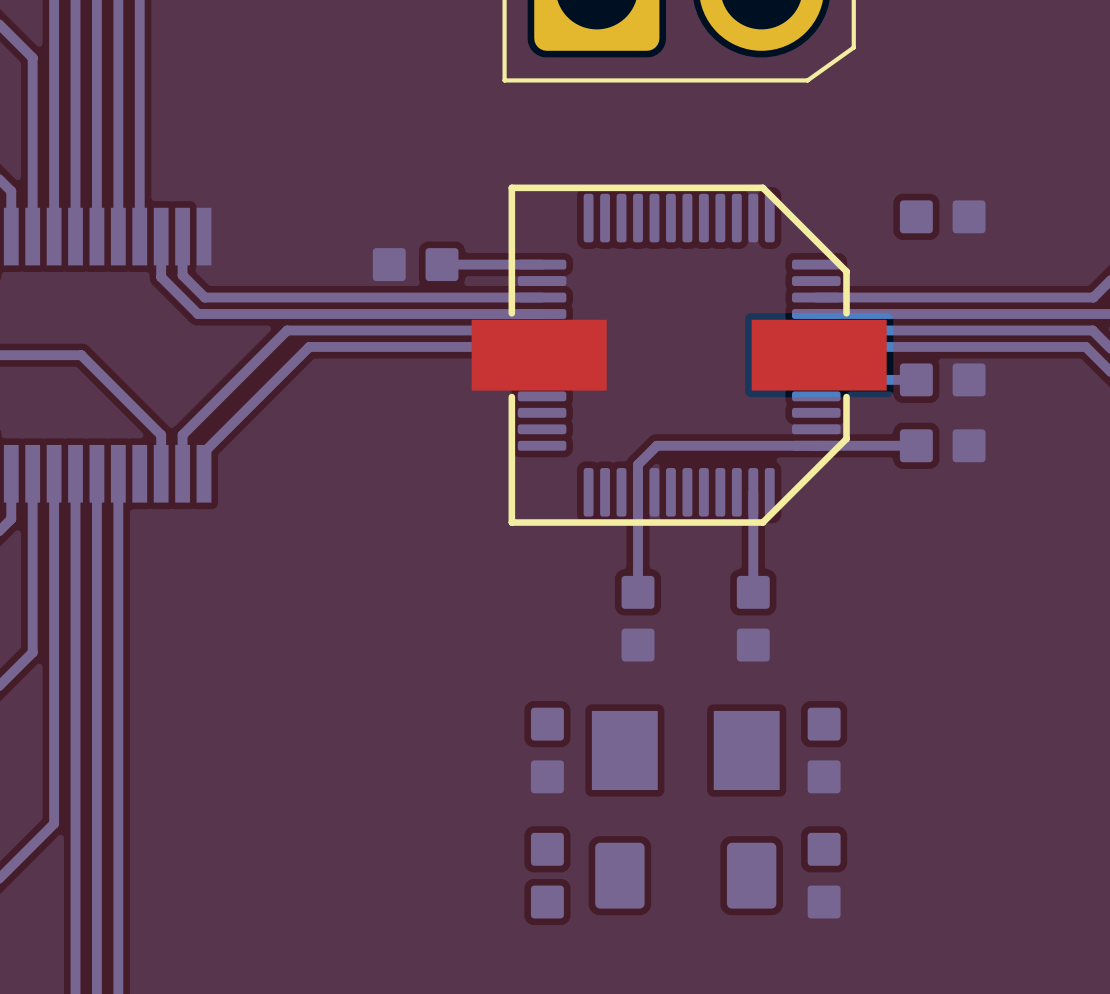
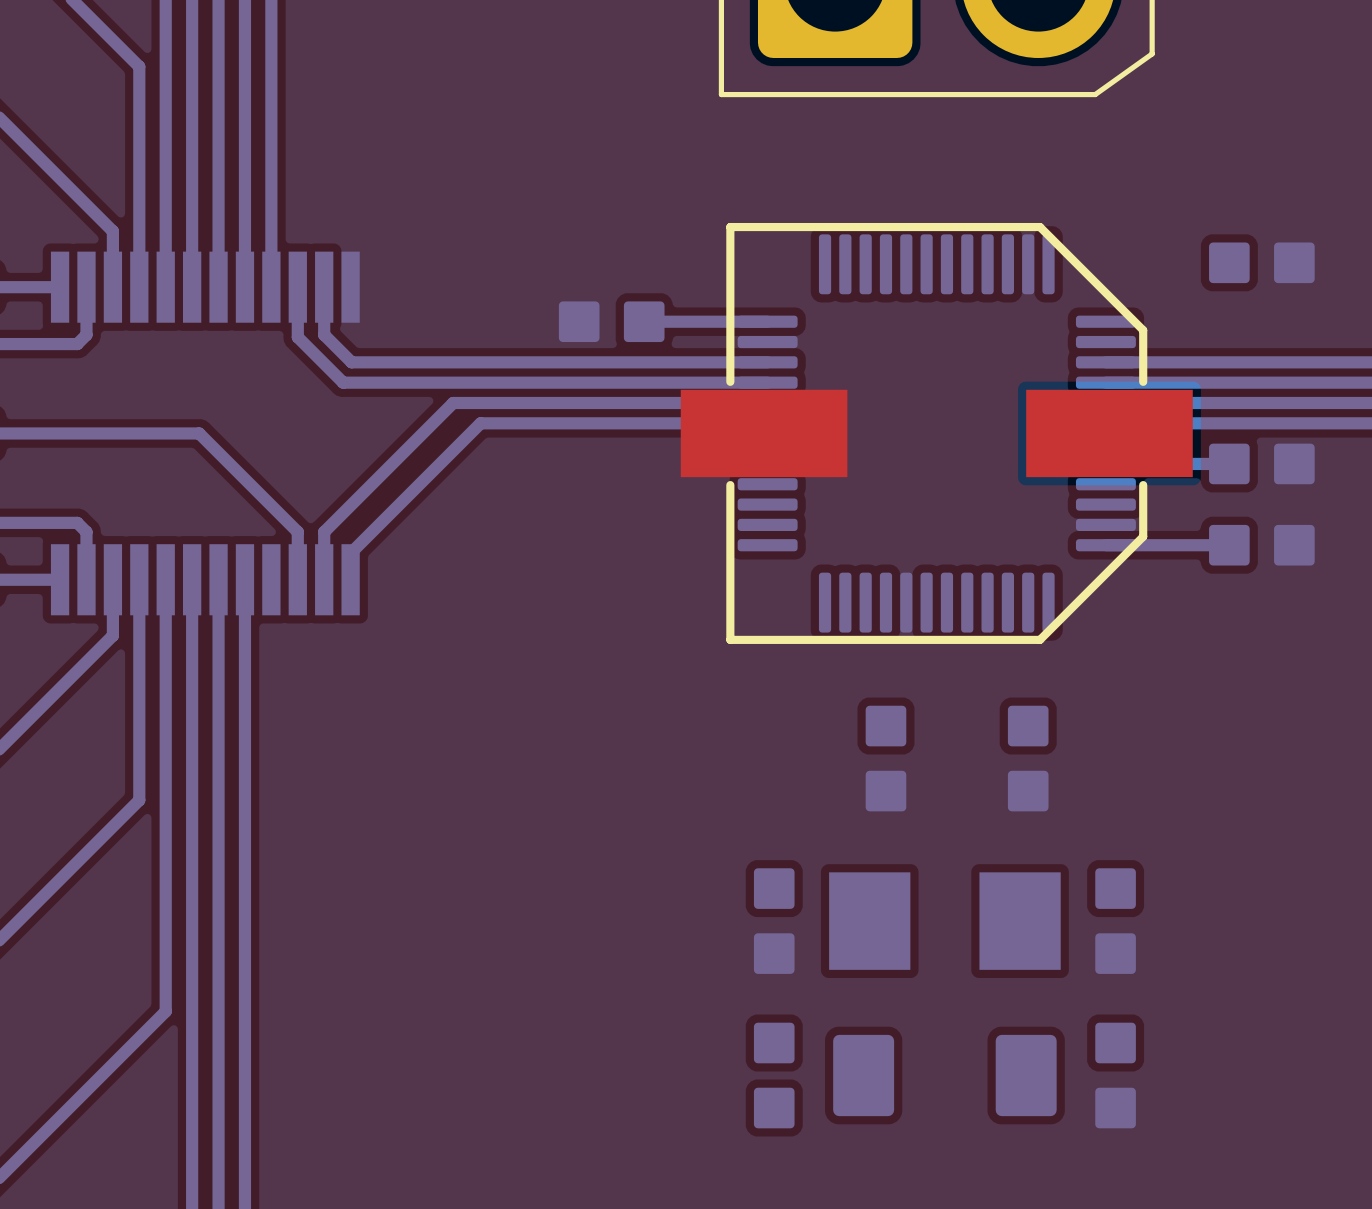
bottom track: (816, 445) (656, 445) (638, 464) (638, 592) -> none
bottom track: (753, 492) (753, 592) -> none

